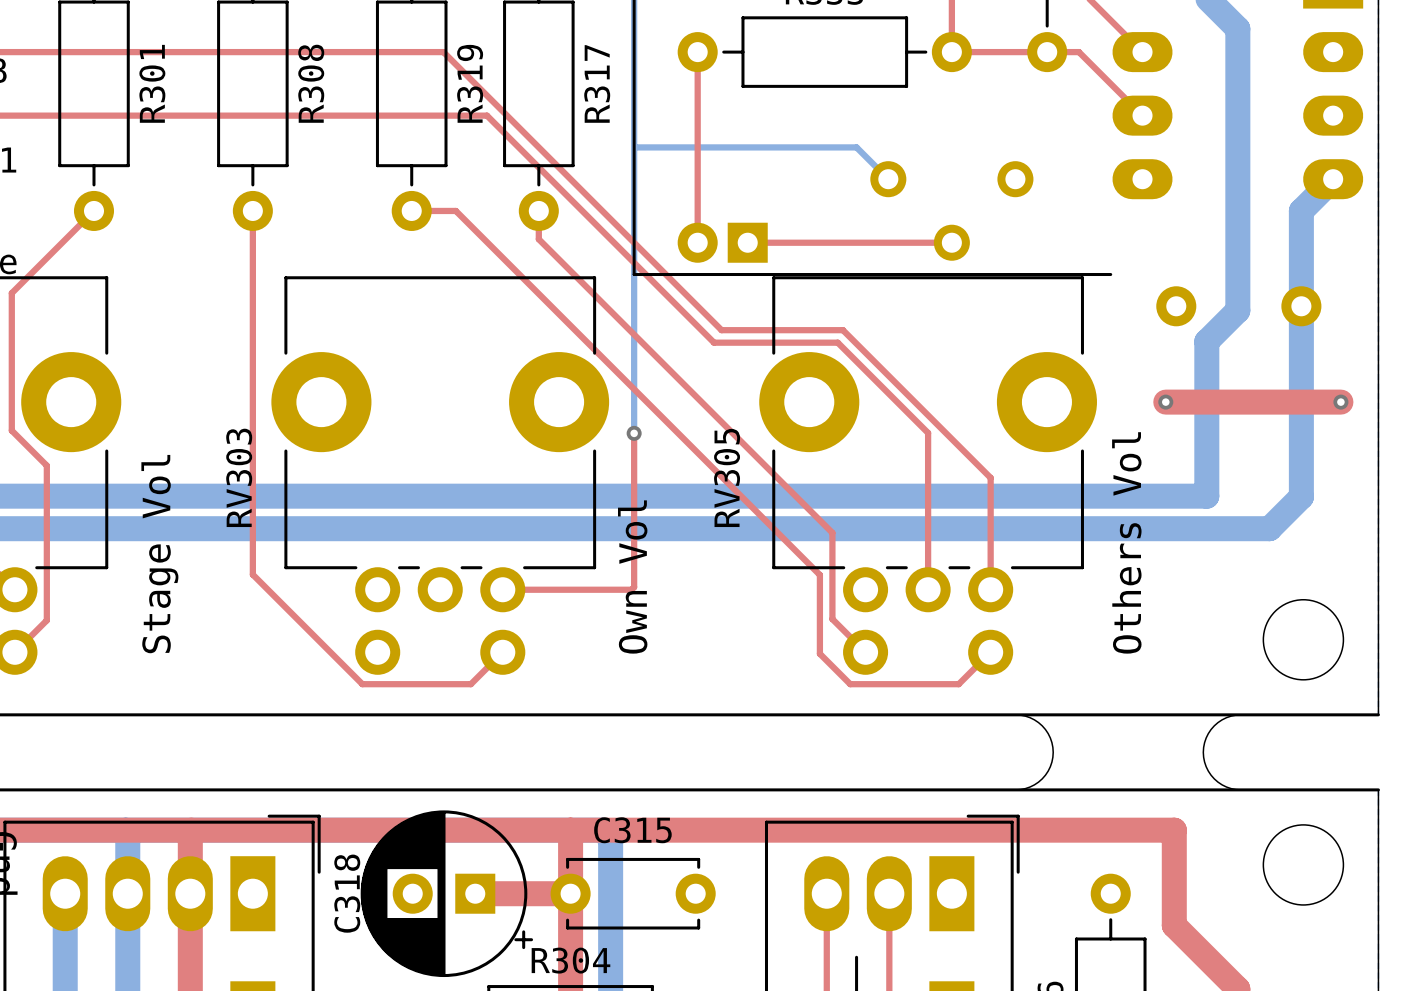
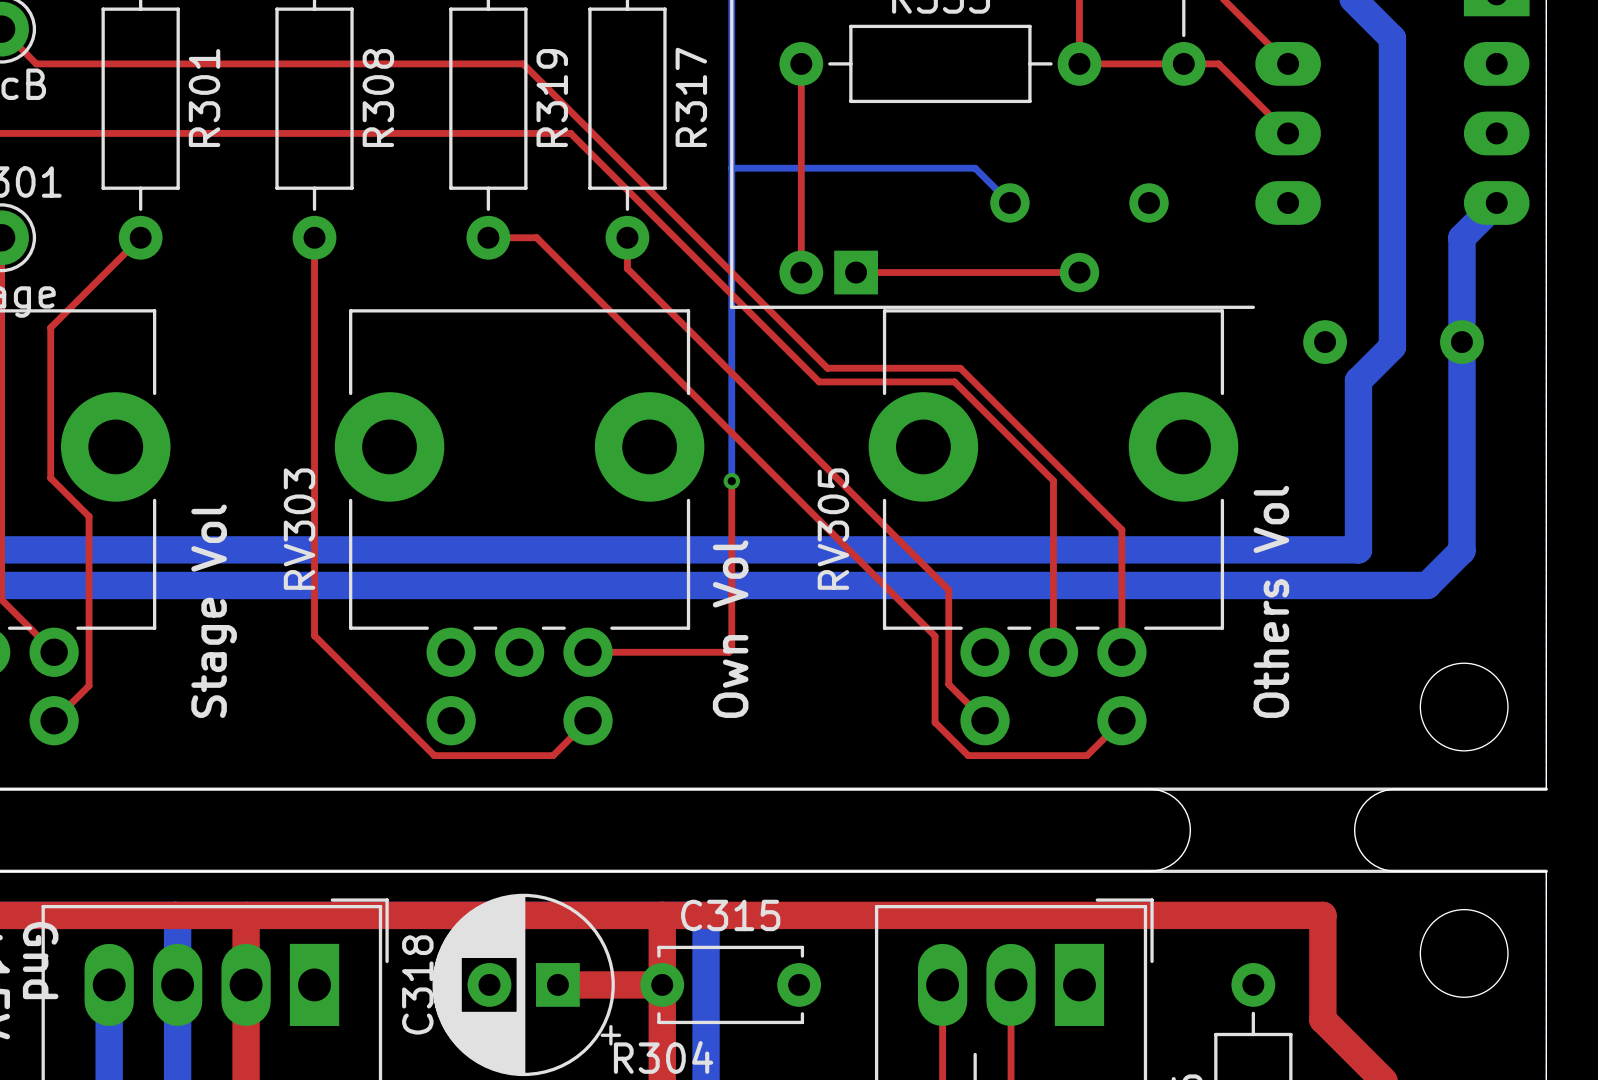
top track: (1165, 402) (1340, 402) -> none
via: (1165, 402) -> none
via: (1340, 402) -> none

